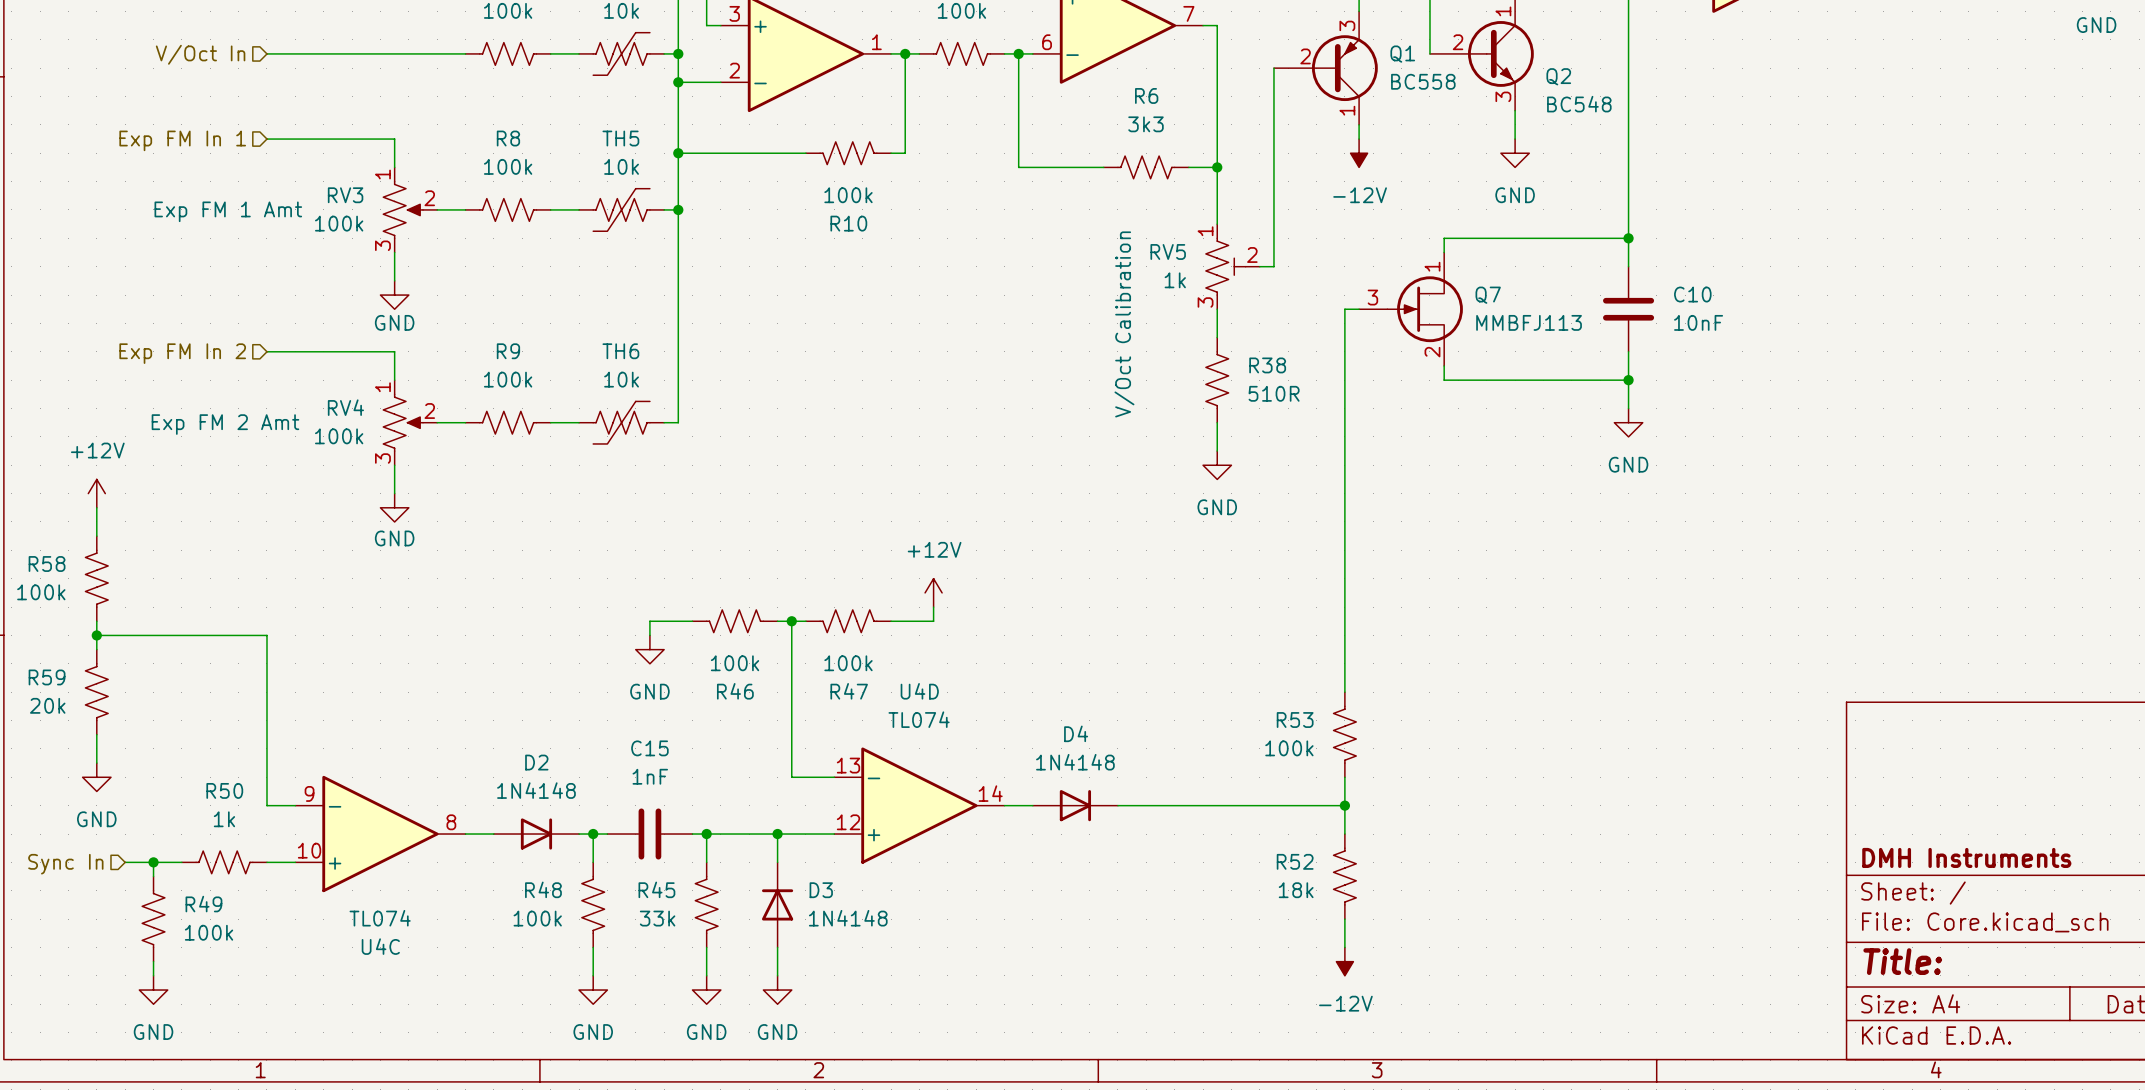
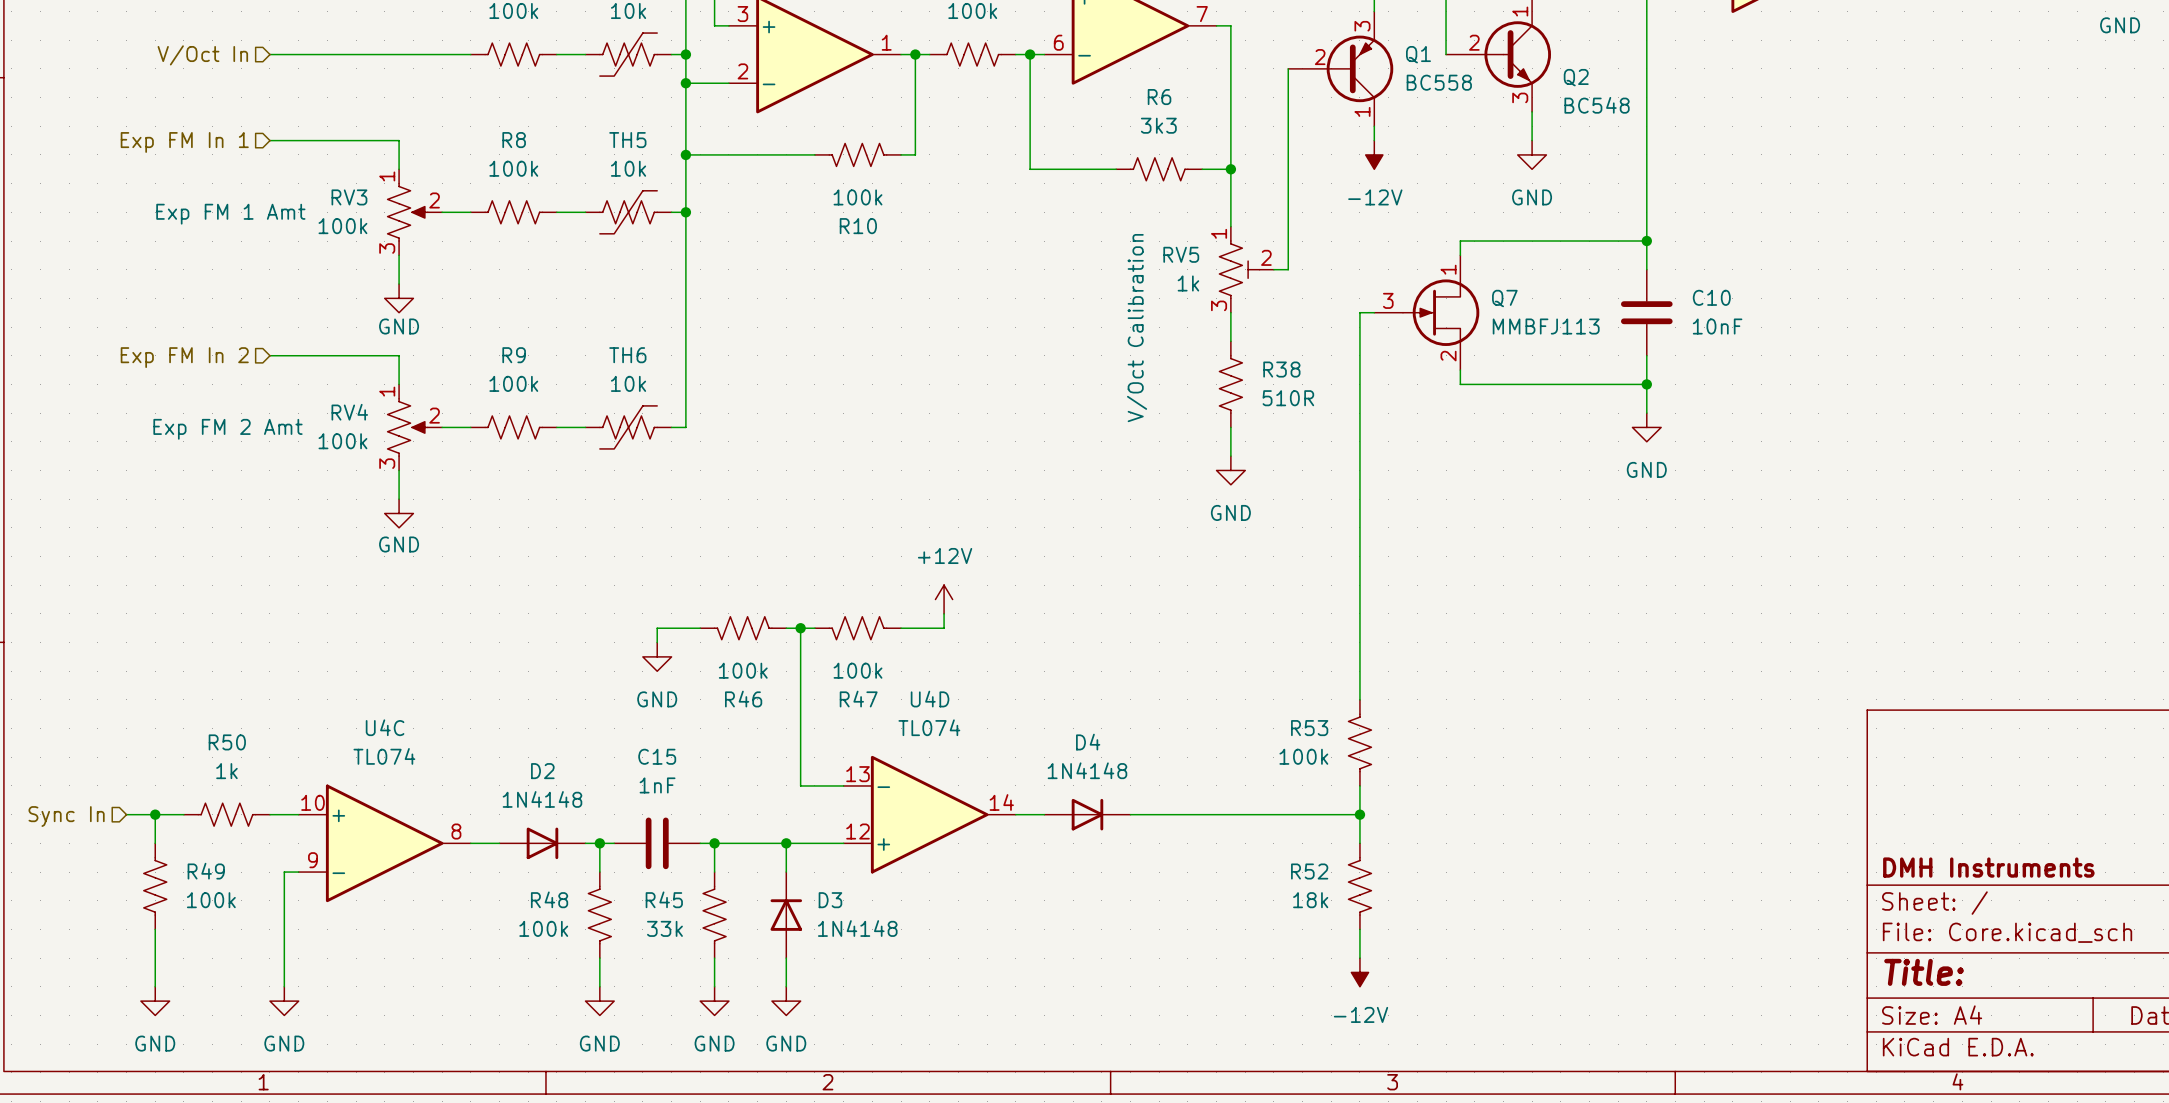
power symbol: +12V (96, 493) -> none
wire: (96, 507) (96, 536) -> none
R58: 100k (96, 578) -> none
wire: (96, 621) (96, 649) -> none
wire: (96, 635) (266, 635) (266, 805) -> none
junction: (96, 635) -> none
R59: 20k (96, 692) -> none
wire: (96, 734) (96, 763) -> (155, 814) (155, 843)
power symbol: GND (96, 777) -> none
U4C flip: as is (380, 834) -> up-down (384, 843)
wire: (125, 862) (181, 862) -> (126, 814) (183, 814)
wire: (153, 862) (153, 876) -> none
junction position: (153, 862) -> (155, 814)
R50 position: (224, 862) -> (226, 814)
wire: (266, 862) (281, 862) -> (284, 986) (284, 872)
hierarchical label position: Sync In (65, 864) -> Sync In (66, 816)
R49 position: (153, 919) -> (155, 886)
power symbol: none -> GND (284, 1001)

